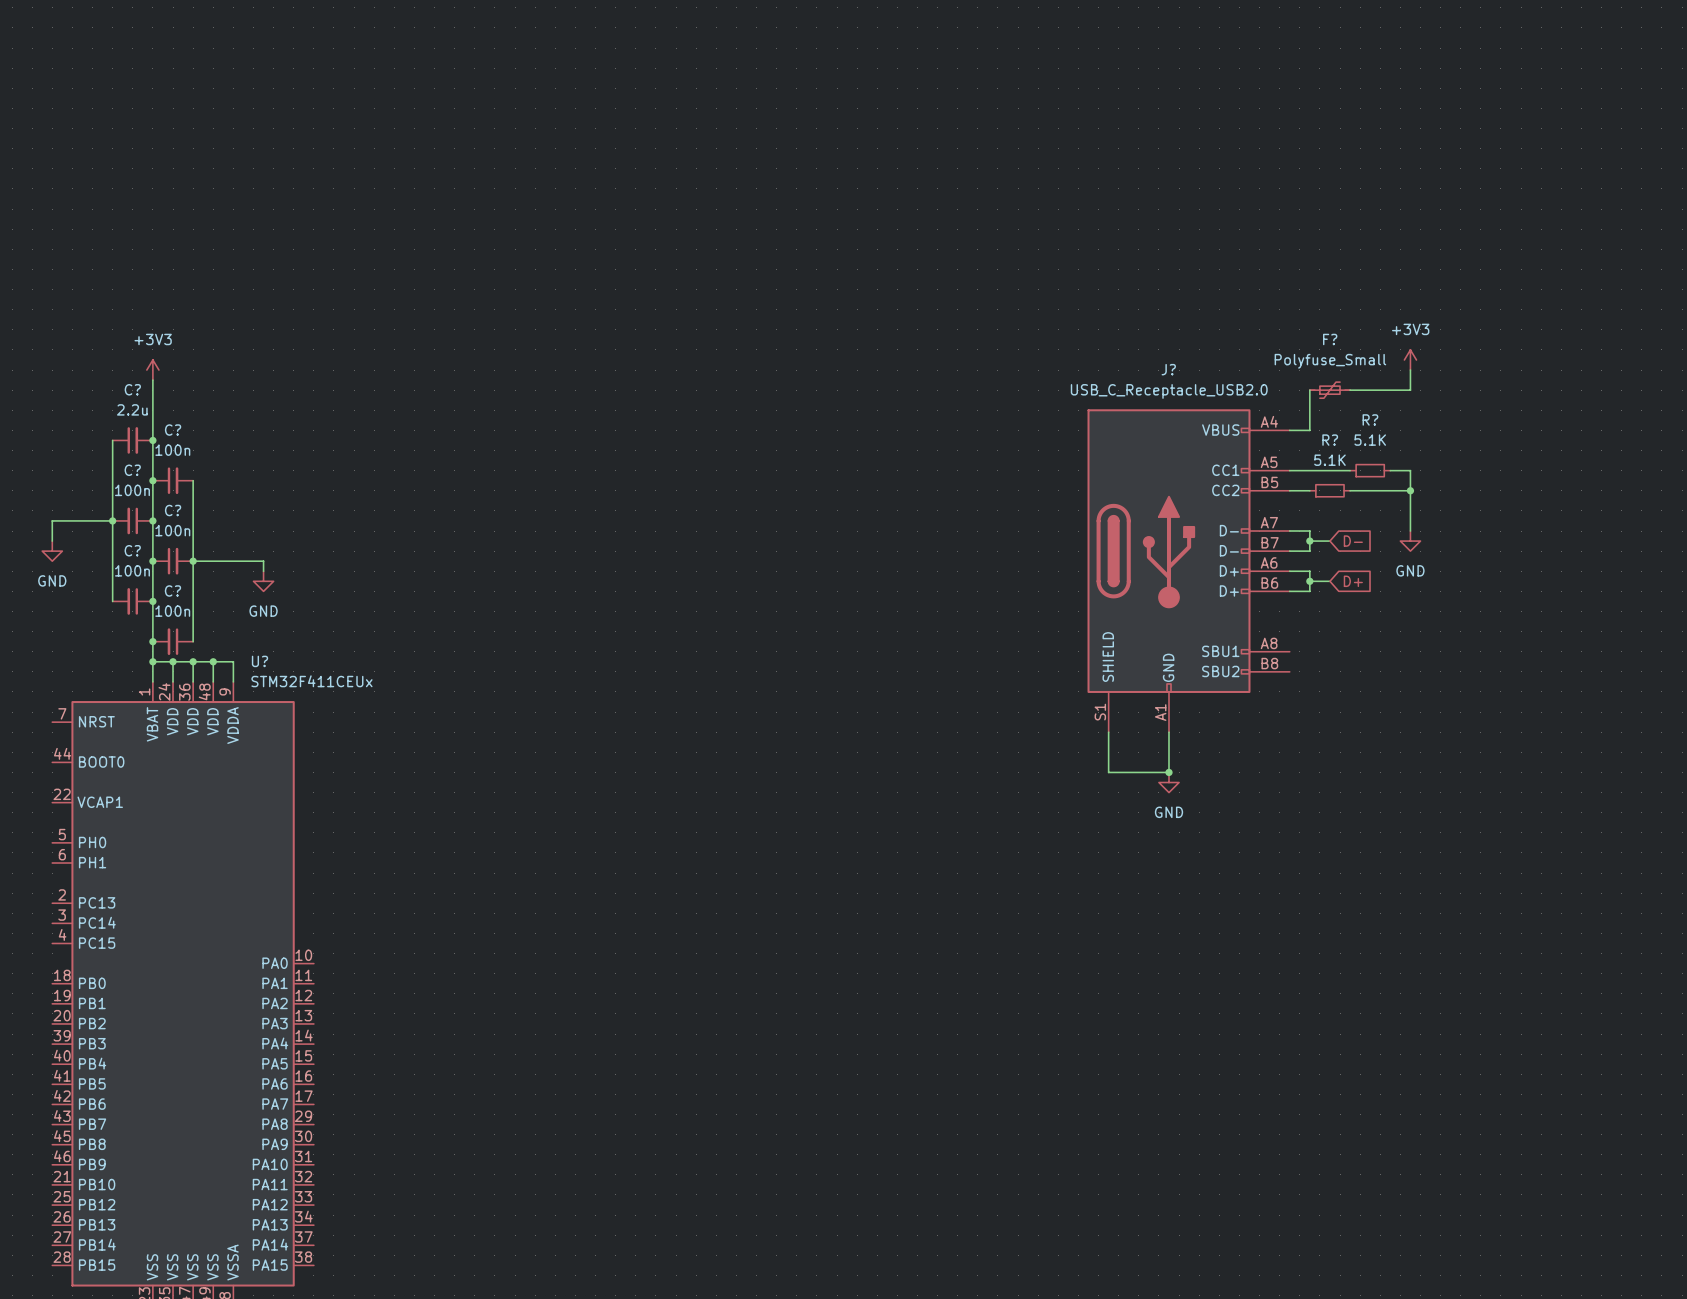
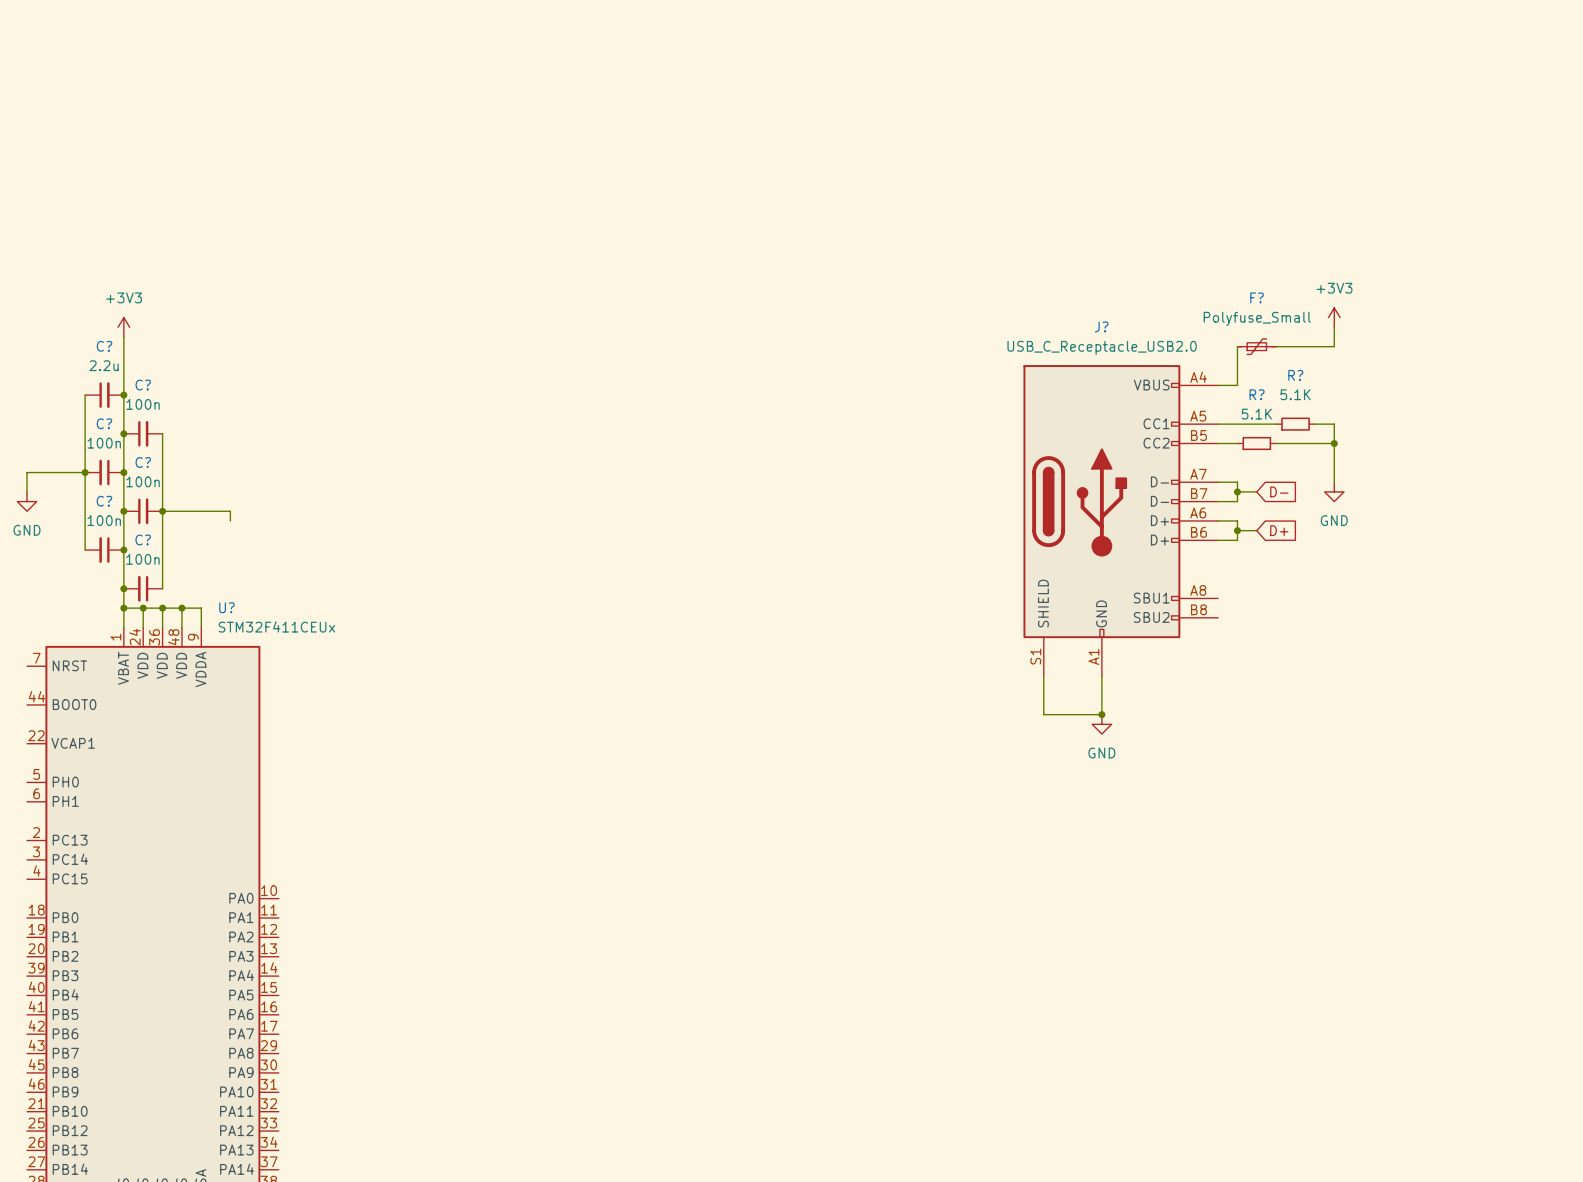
power symbol: GND (263, 581) -> none

